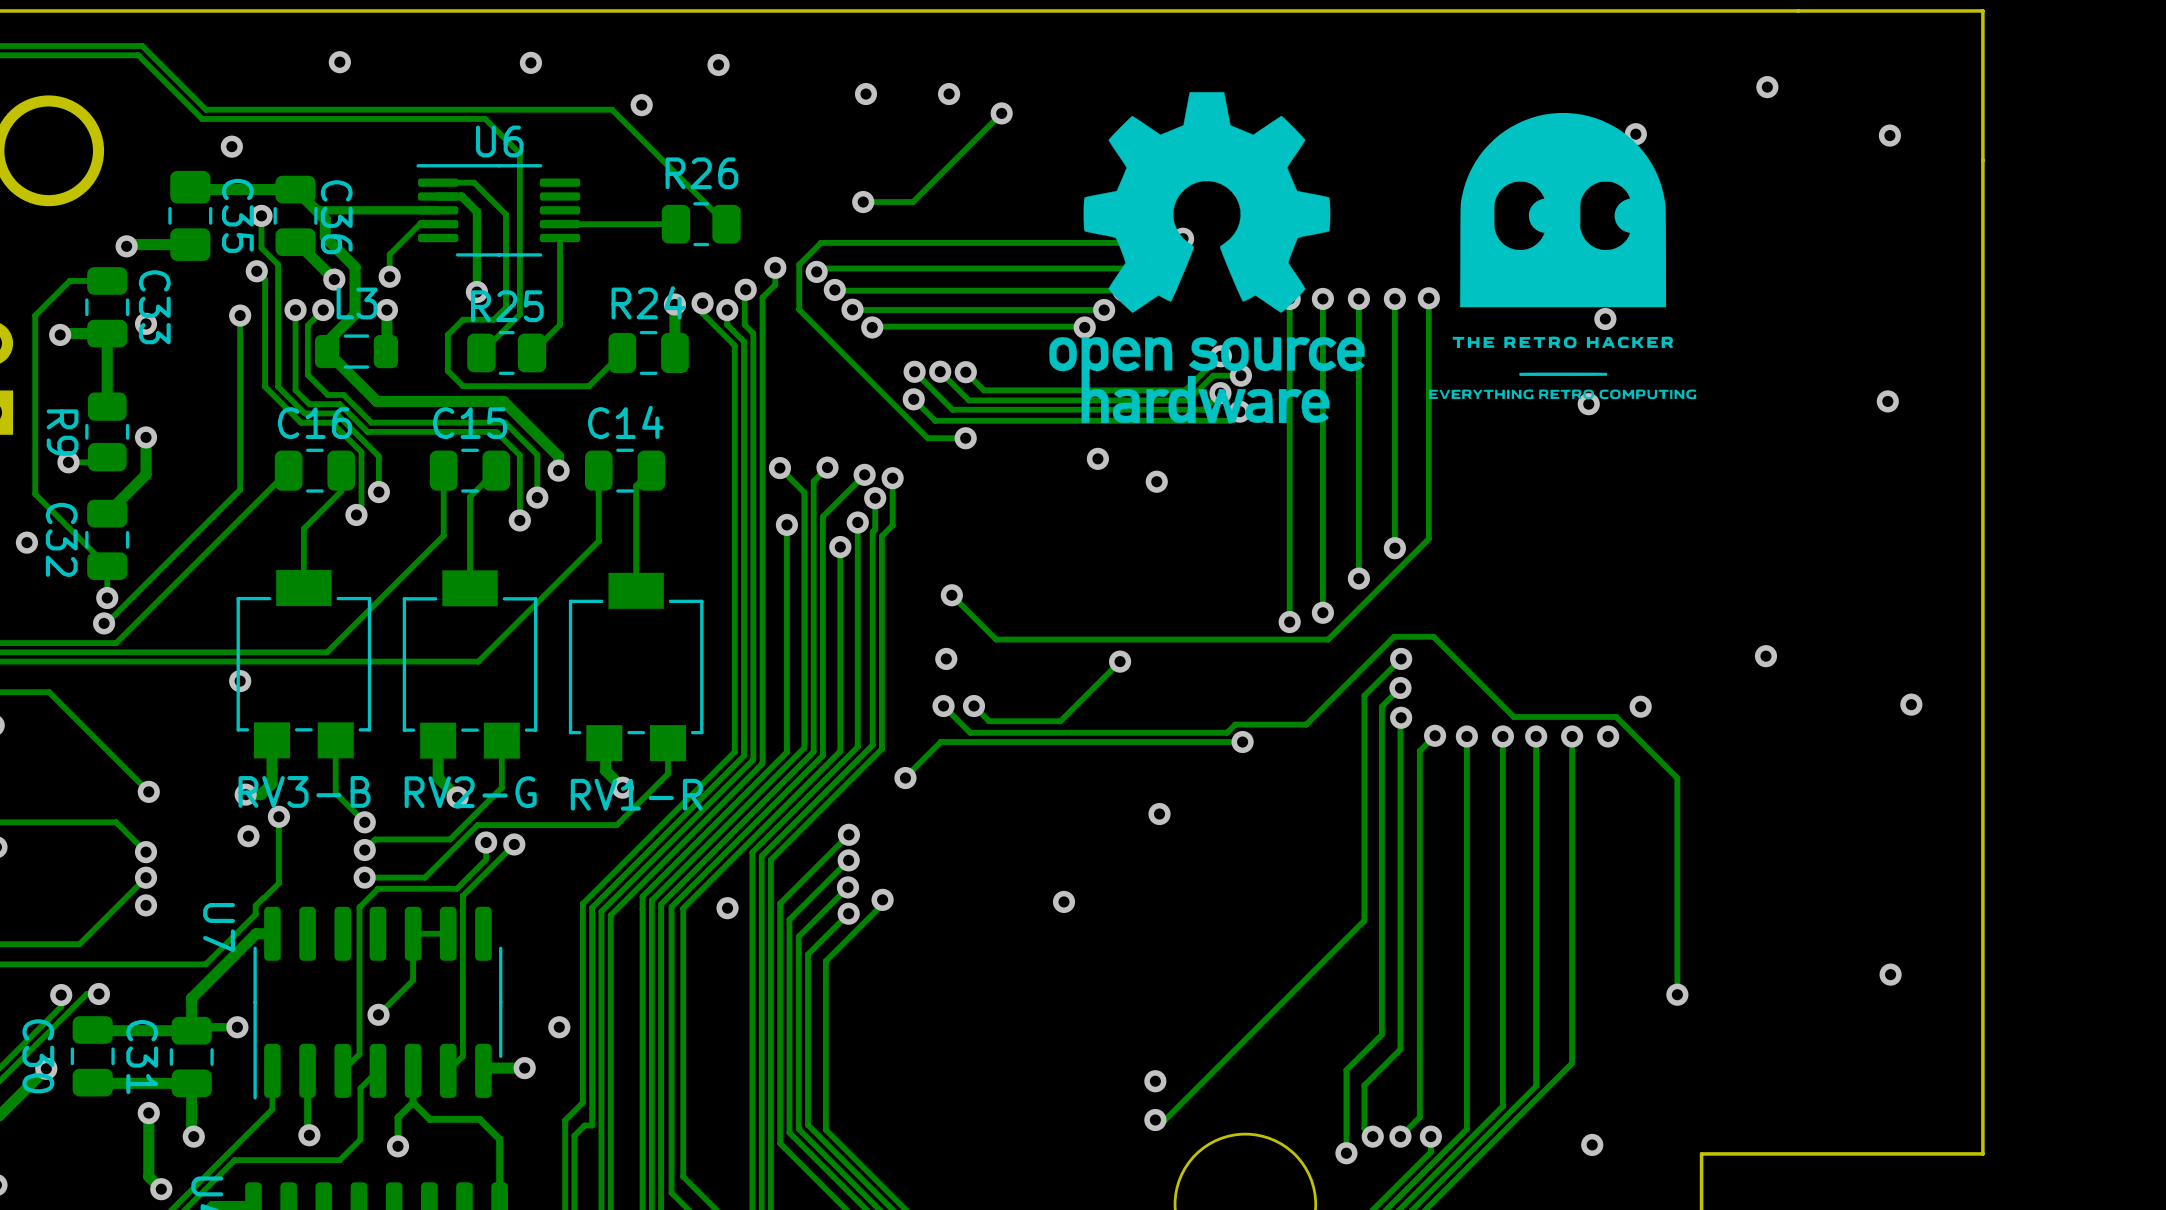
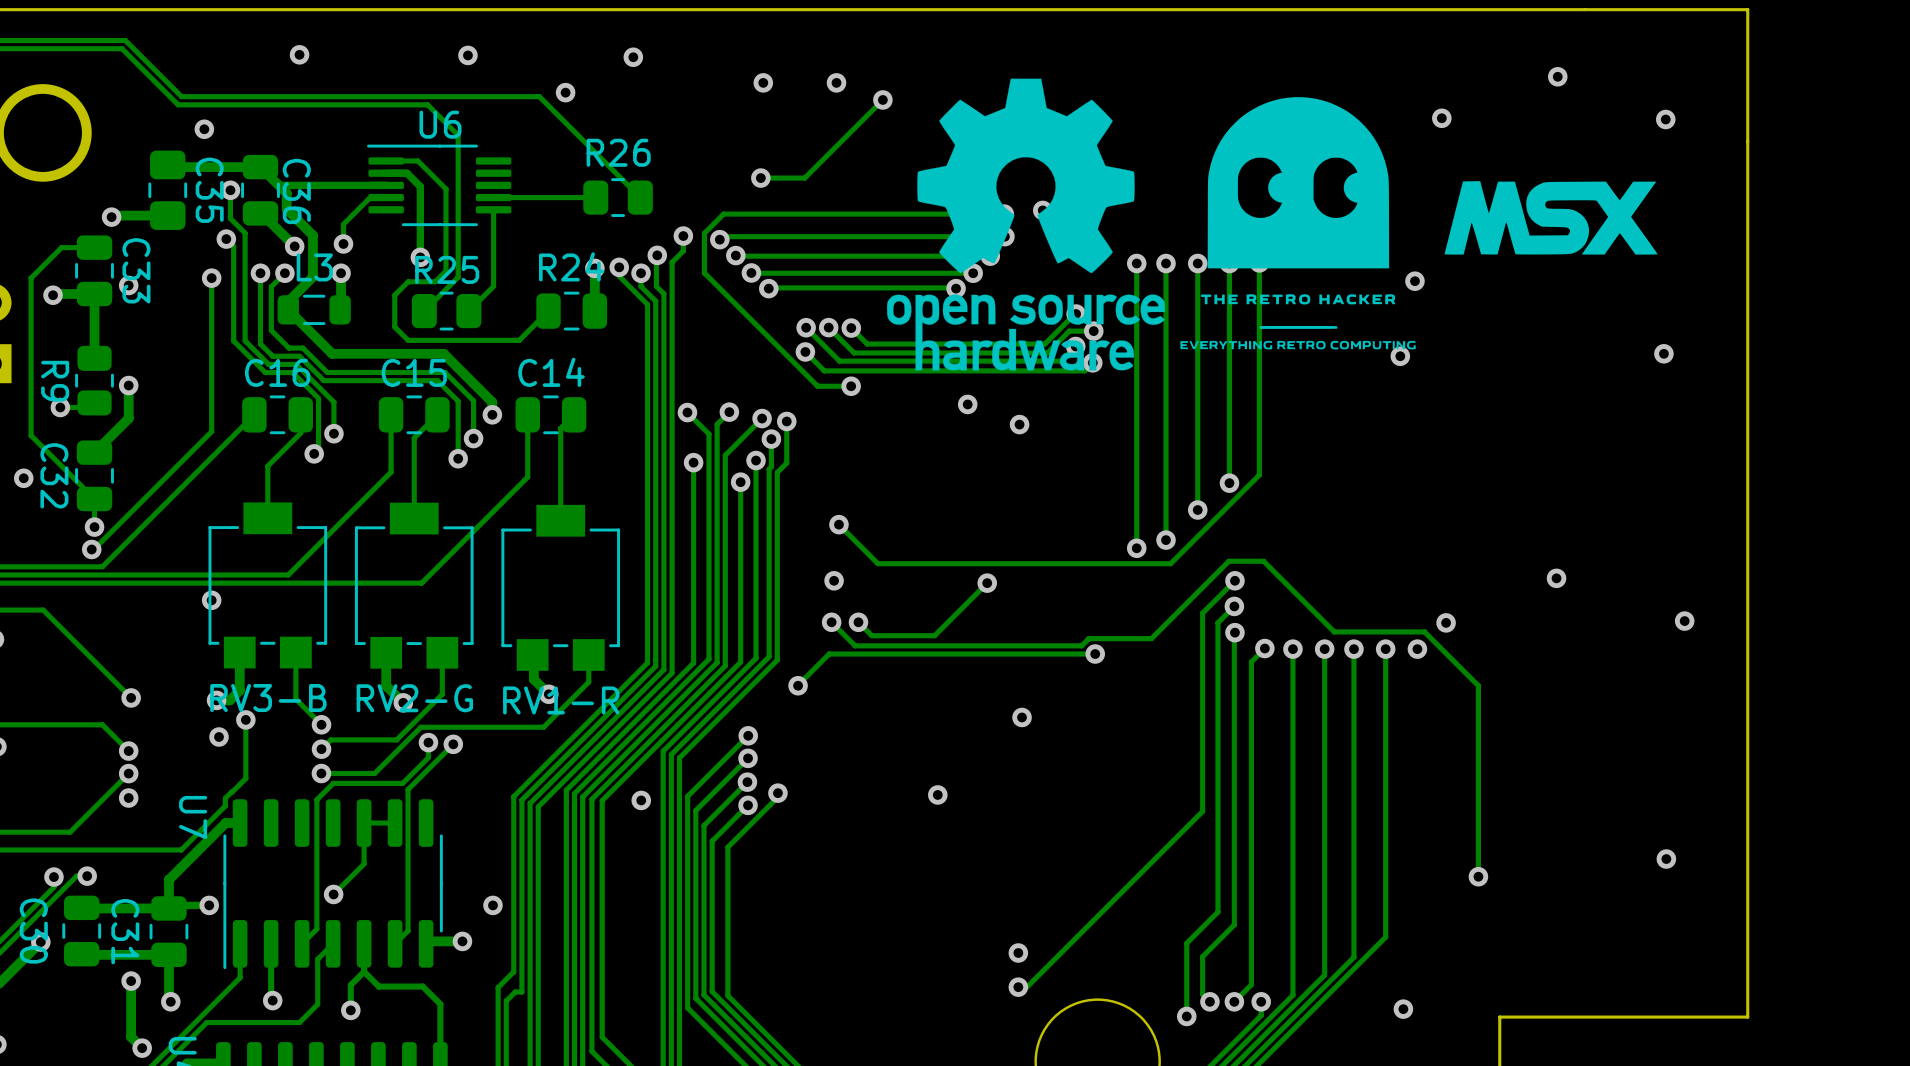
drawing: none -> [1444, 181, 1658, 255]
drawing position: (1562, 256) -> (1298, 223)
drawing position: (1206, 257) -> (1026, 224)

